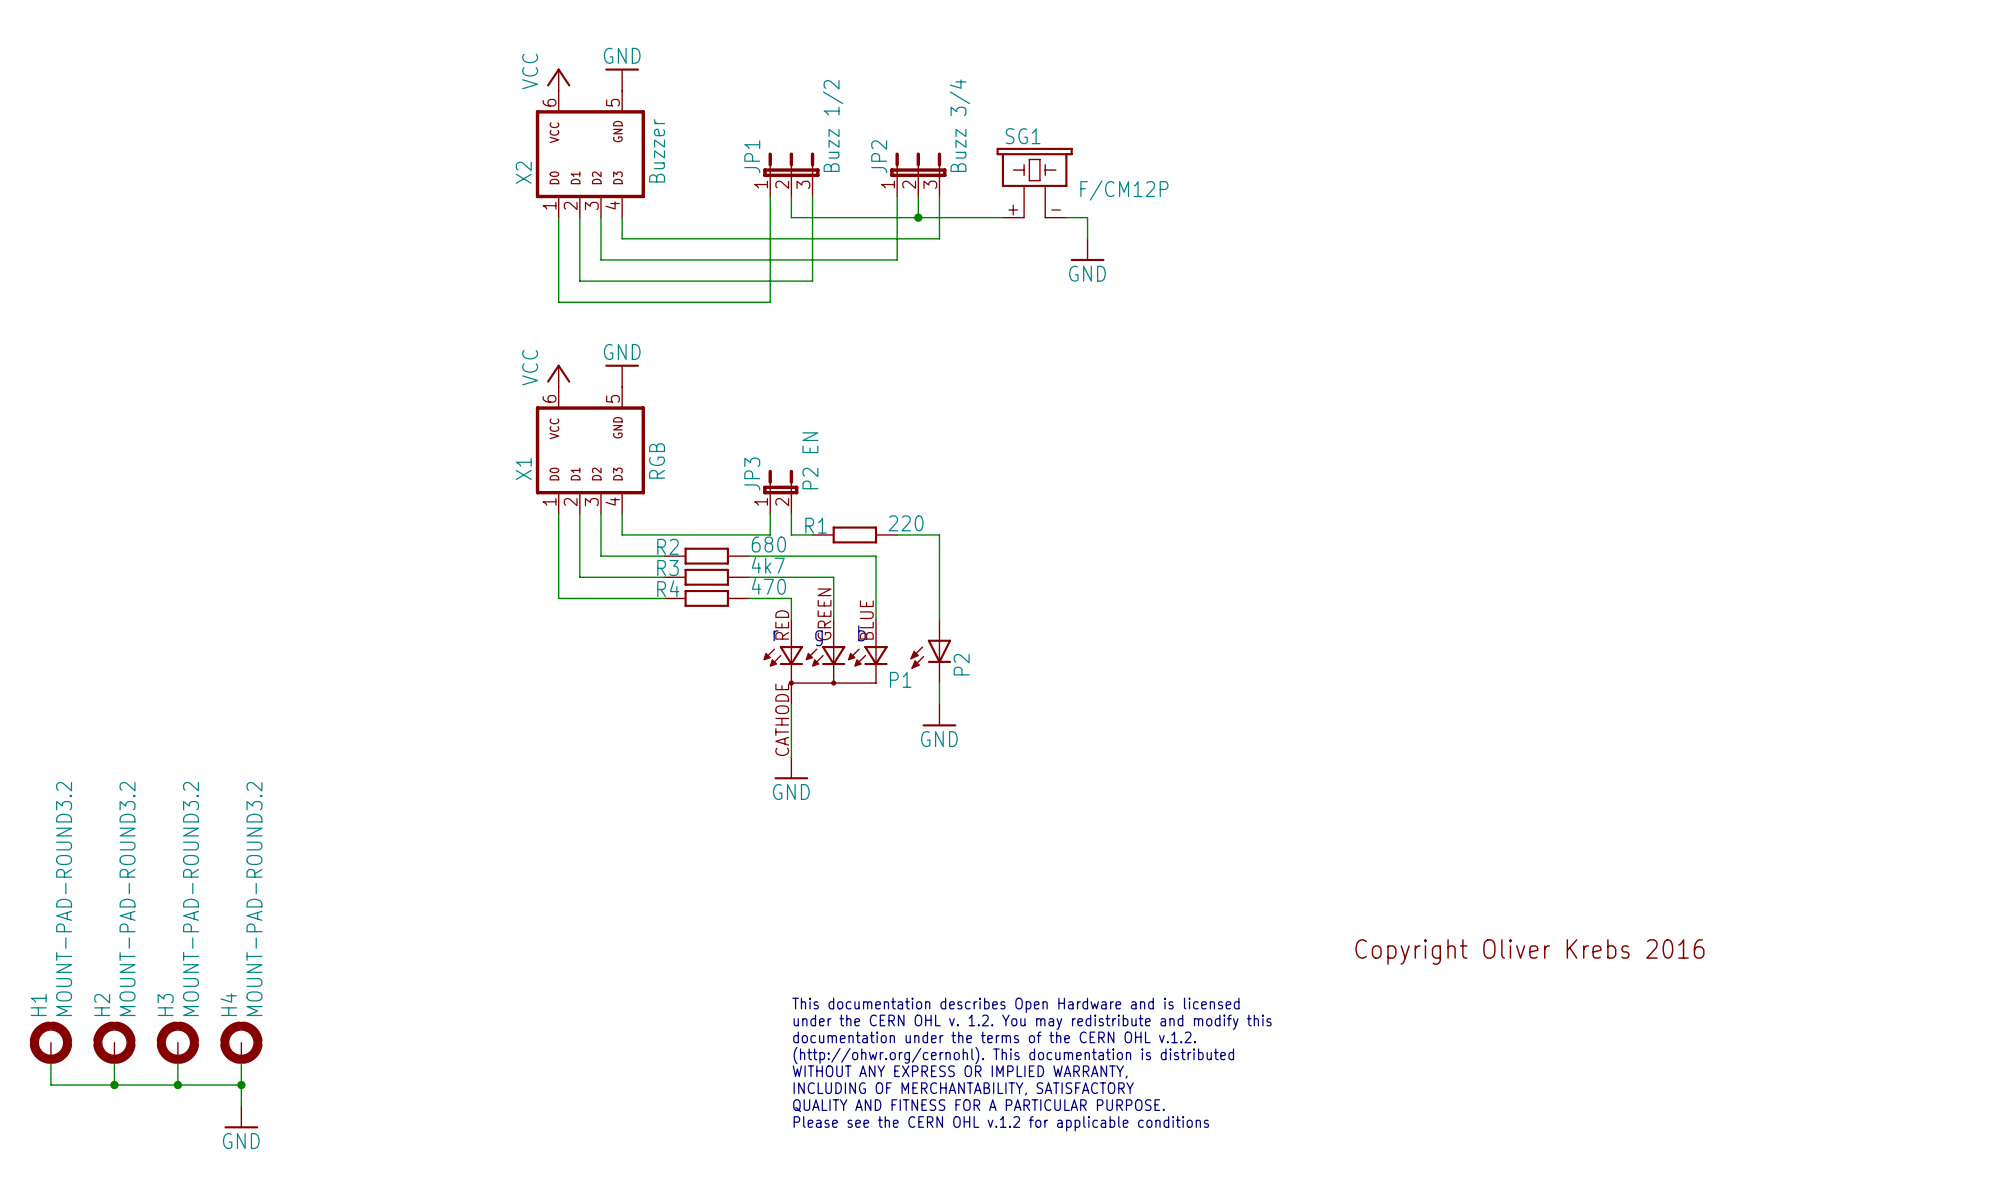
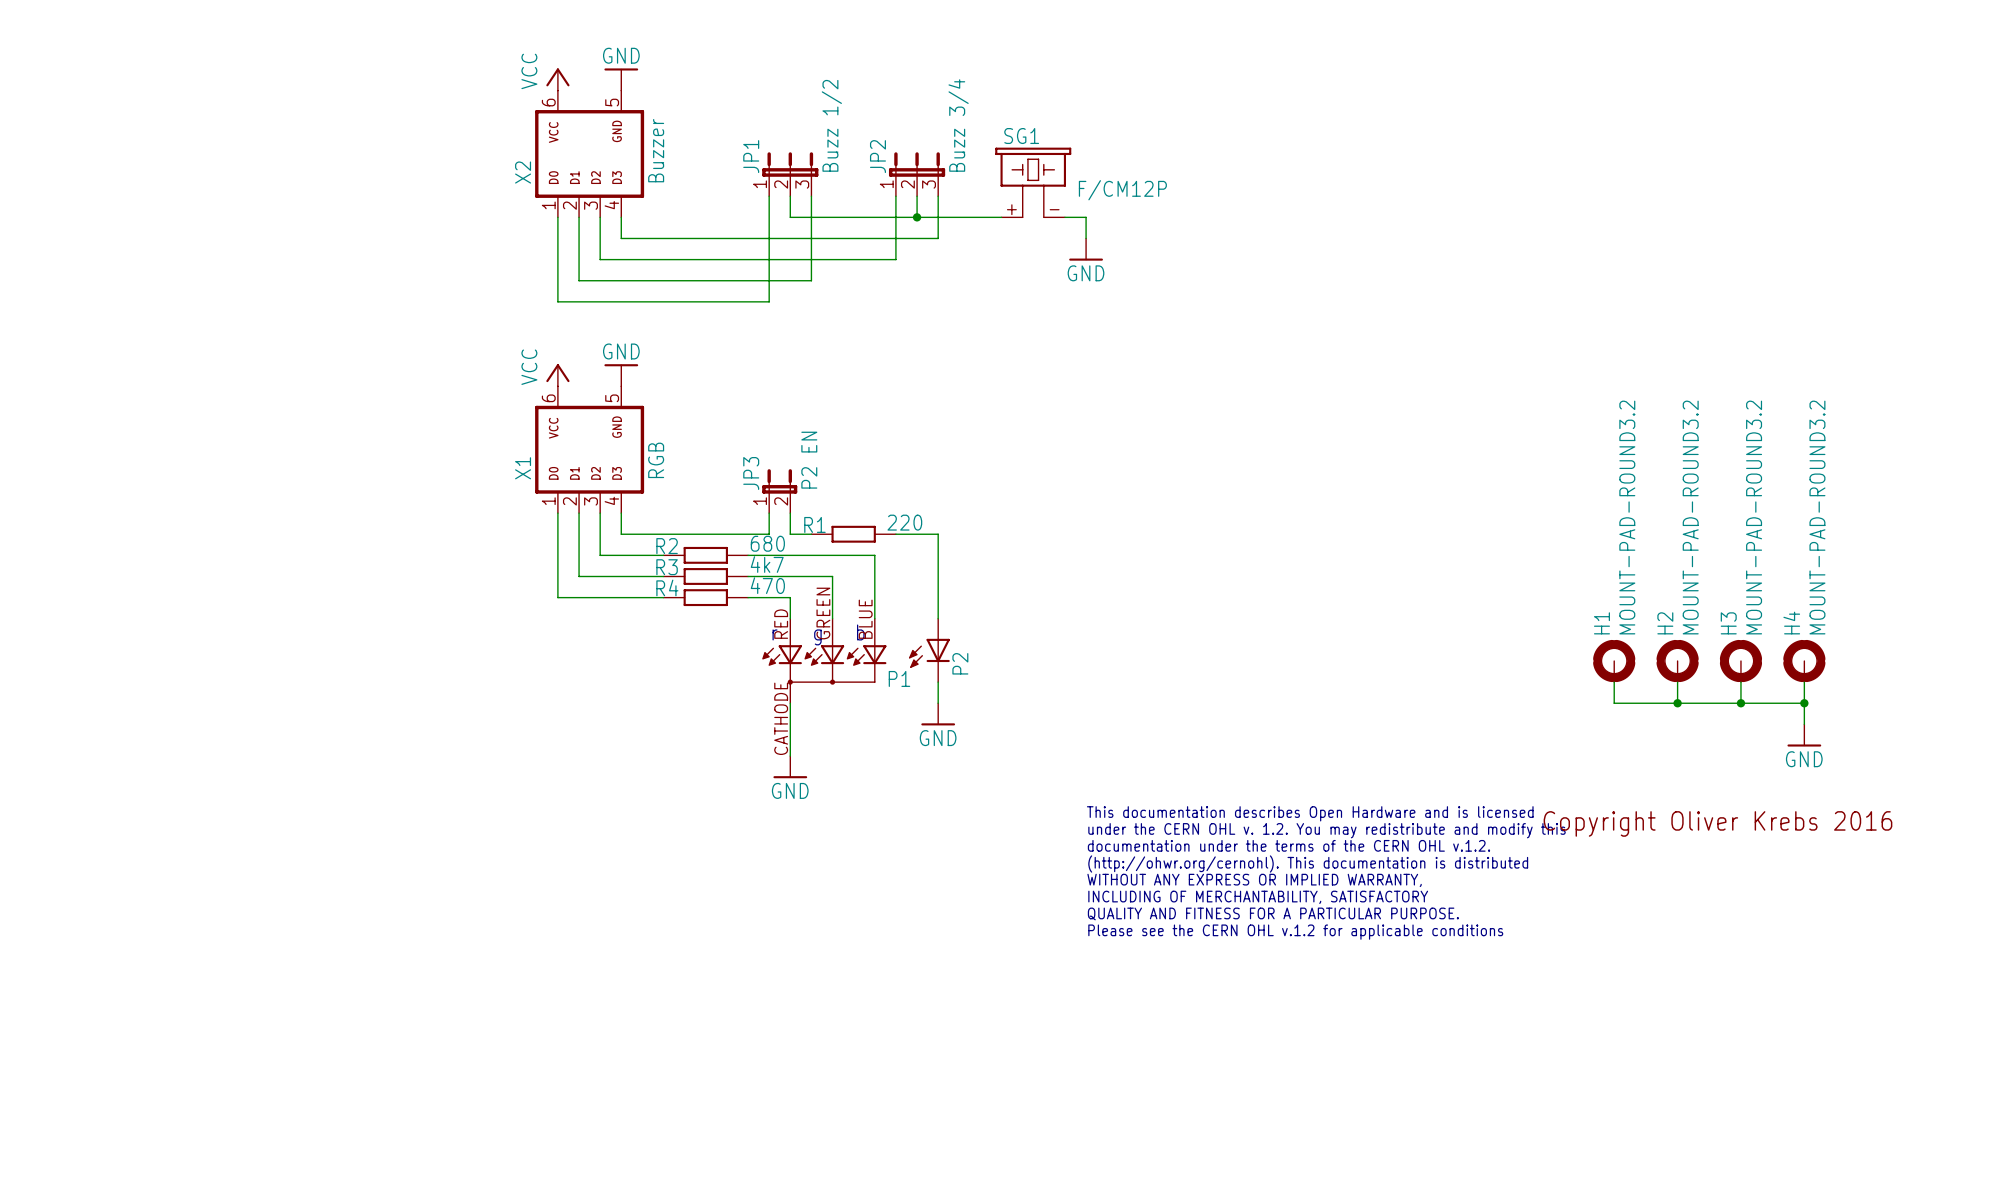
wire: none -> (1614, 682) (1614, 703) (1804, 703)
wire: none -> (1677, 682) (1677, 703)
wire: none -> (1740, 682) (1740, 703)
wire: none -> (1804, 682) (1804, 724)
junction: none -> (1677, 703)
junction: none -> (1740, 703)
junction: none -> (1804, 703)
power symbol: none -> GND (1804, 735)
text: none -> This documentation describes Open Hardware and is licensed (1310, 813)
text: none -> Copyright Oliver Krebs 2016 (1717, 823)
text: none -> under the CERN OHL v. 1.2. You may redistribute and modify this (1327, 830)
text: none -> documentation under the terms of the CERN OHL v.1.2. (1288, 845)
text: none -> (http://ohwr.org/cernohl). This documentation is distributed (1308, 864)
text: none -> WITHOUT ANY EXPRESS OR IMPLIED WARRANTY, (1254, 880)
text: none -> INCLUDING OF MERCHANTABILITY, SATISFACTORY (1258, 897)
text: none -> QUALITY AND FITNESS FOR A PARTICULAR PURPOSE. (1273, 913)
text: none -> Please see the CERN OHL v.1.2 for applicable conditions (1295, 932)
text: Copyright Oliver Krebs 2016 (1529, 952) -> none
text: This documentation describes Open Hardware and is licensed (1015, 1005) -> none
text: under the CERN OHL v. 1.2. You may redistribute and modify this (1032, 1022) -> none
text: documentation under the terms of the CERN OHL v.1.2. (994, 1037) -> none
H1 position: (50, 1042) -> (1614, 661)
H2 position: (114, 1042) -> (1677, 661)
H3 position: (177, 1042) -> (1740, 661)
H4 position: (241, 1042) -> (1804, 661)
text: (http://ohwr.org/cernohl). This documentation is distributed (1013, 1055) -> none
wire: (50, 1063) (50, 1085) (241, 1085) -> none
wire: (114, 1063) (114, 1085) -> none
wire: (177, 1063) (177, 1085) -> none
wire: (241, 1063) (241, 1106) -> none
text: WITHOUT ANY EXPRESS OR IMPLIED WARRANTY, (960, 1072) -> none
junction: (114, 1085) -> none
junction: (177, 1085) -> none
junction: (241, 1085) -> none
text: INCLUDING OF MERCHANTABILITY, SATISFACTORY (963, 1088) -> none
text: QUALITY AND FITNESS FOR A PARTICULAR PURPOSE. (978, 1105) -> none
power symbol: GND (241, 1117) -> none
text: Please see the CERN OHL v.1.2 for applicable conditions (1001, 1123) -> none

